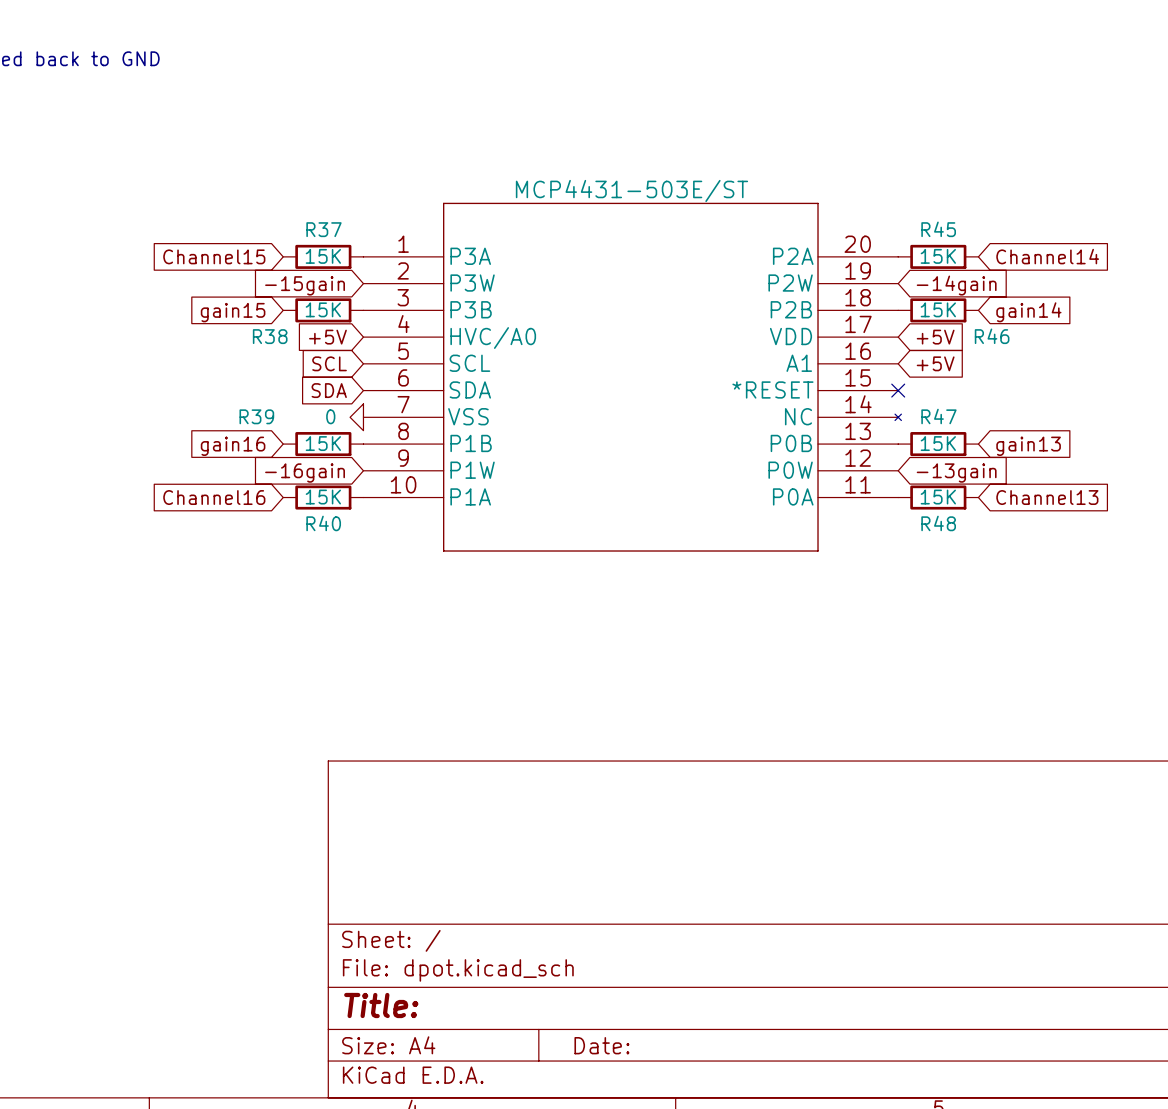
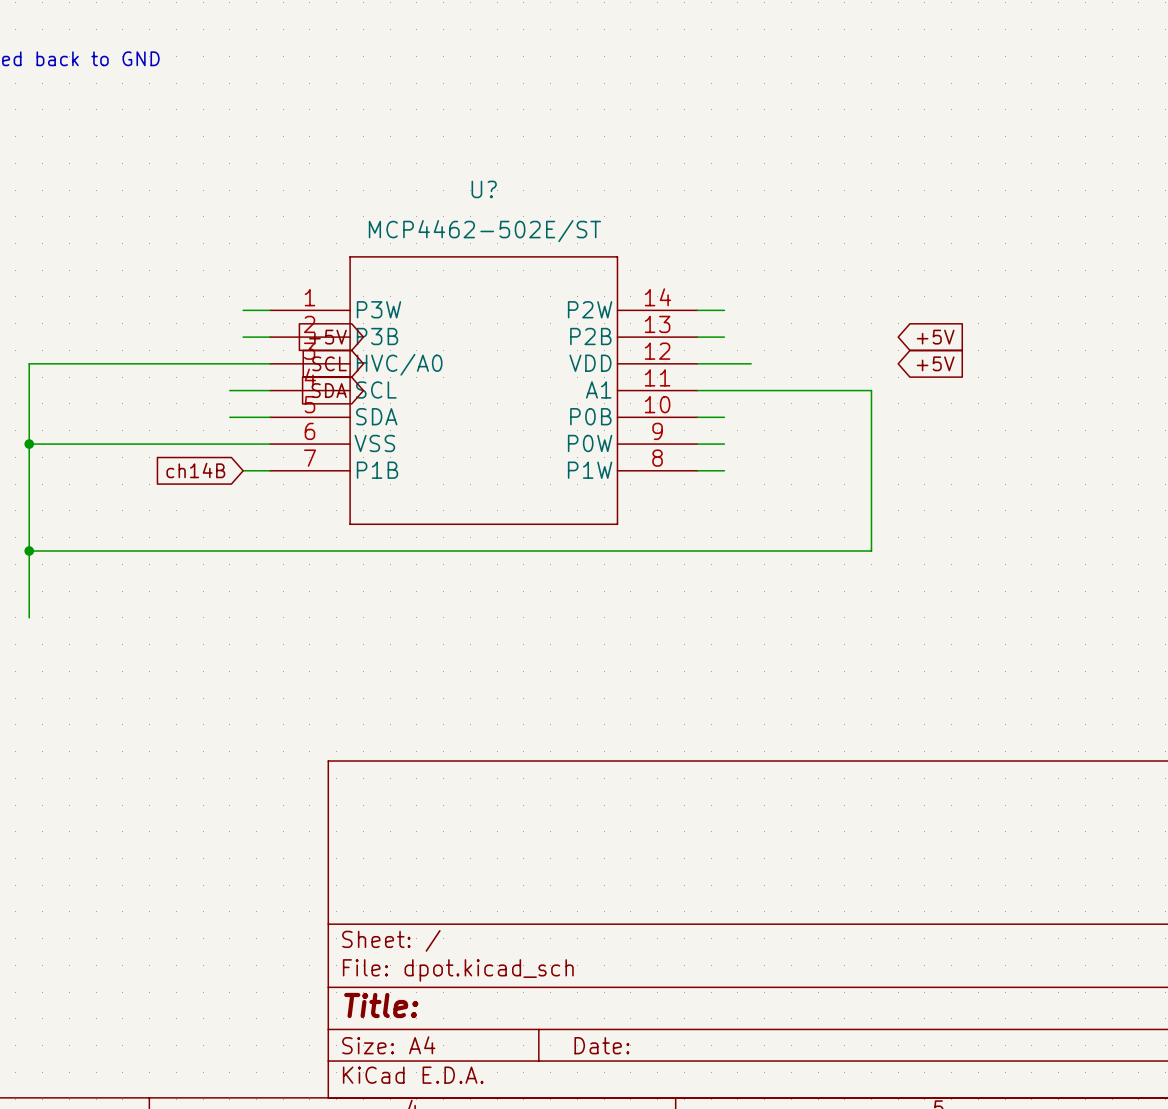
global label: Channel15 (214, 256) -> none
R37: 15K (323, 256) -> none
R45: 15K (938, 256) -> none
global label: Channel14 (1047, 256) -> none
global label: -15gain (305, 285) -> none
global label: -14gain (956, 285) -> none
wire: none -> (243, 310) (269, 310)
R38: 15K (323, 310) -> none
wire: none -> (697, 310) (724, 310)
R46: 15K (938, 310) -> none
global label: gain15 (233, 312) -> none
global label: gain14 (1028, 312) -> none
wire: none -> (243, 337) (269, 337)
wire: none -> (697, 337) (724, 337)
wire: none -> (269, 363) (29, 363) (29, 617)
wire: none -> (697, 363) (751, 363)
part: MCP4431-503E/ST (632, 377) -> none
wire: none -> (229, 390) (269, 390)
U?: none -> MCP4462-502E/ST (483, 390)
wire: none -> (697, 390) (871, 390) (871, 551) (29, 551)
no-connect mark: (898, 390) -> none
wire: none -> (229, 417) (269, 417)
power symbol: 0 (356, 417) -> none
wire: none -> (697, 417) (724, 417)
wire: none -> (29, 444) (269, 444)
junction: none -> (29, 444)
R39: 15K (323, 444) -> none
wire: none -> (697, 444) (724, 444)
R47: 15K (938, 444) -> none
global label: gain16 (233, 446) -> none
global label: gain13 (1028, 446) -> none
global label: none -> ch14B (195, 470)
wire: none -> (243, 470) (269, 470)
wire: none -> (697, 470) (724, 470)
global label: -16gain (305, 473) -> none
global label: -13gain (956, 473) -> none
global label: Channel16 (214, 497) -> none
R40: 15K (323, 497) -> none
R48: 15K (938, 497) -> none
global label: Channel13 (1047, 497) -> none
junction: none -> (29, 551)

